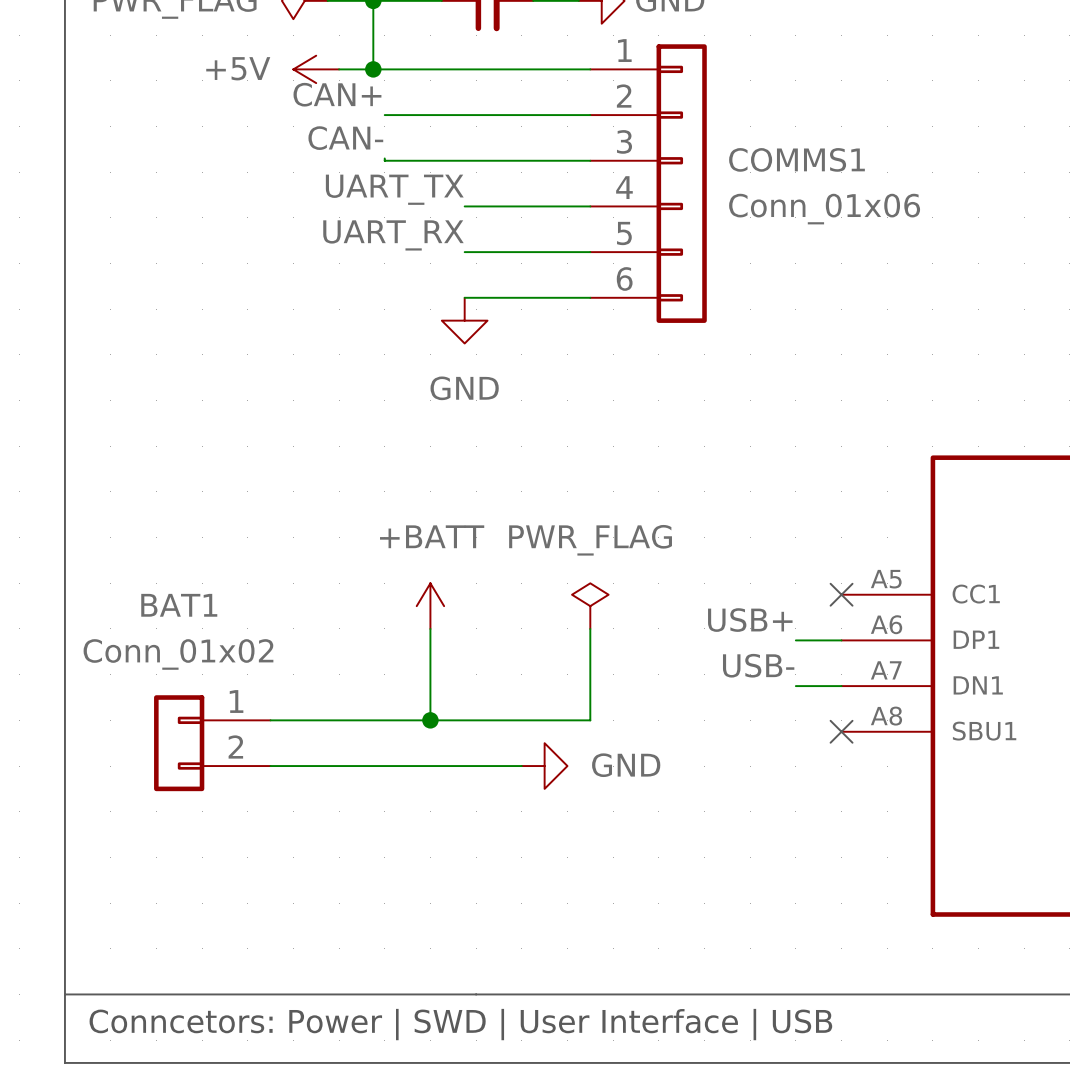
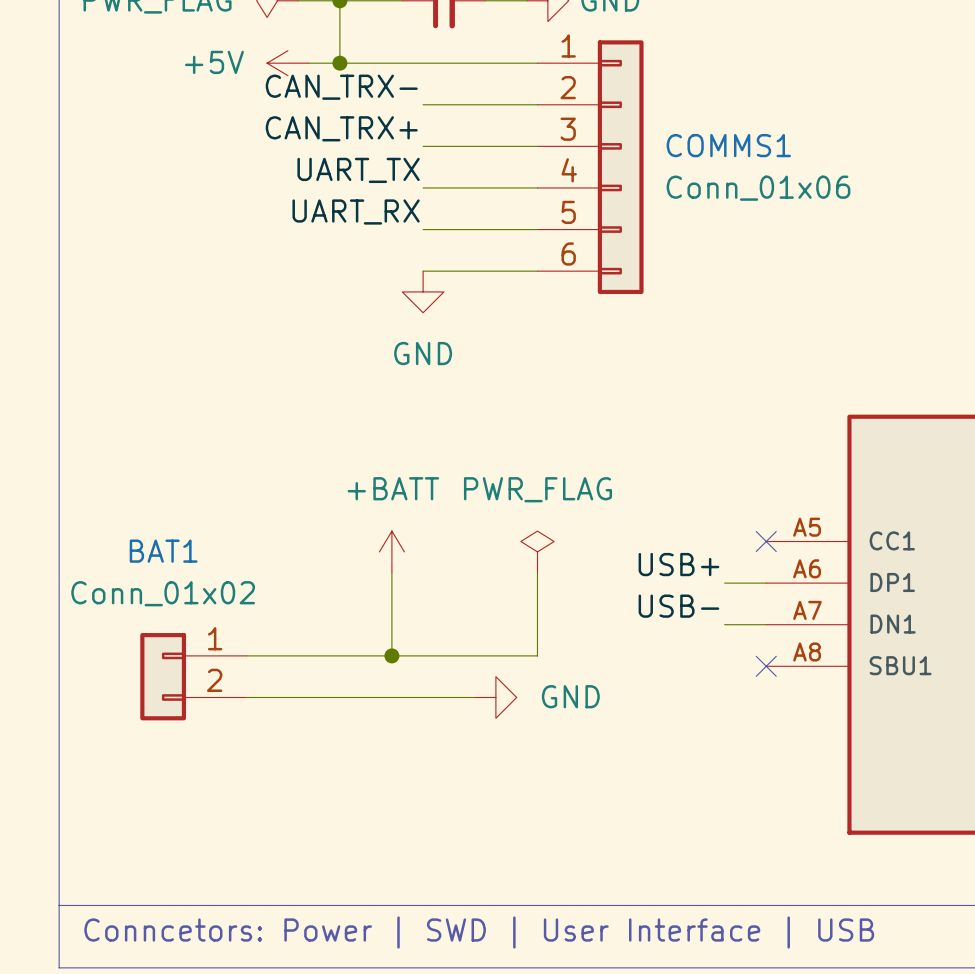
label: CAN+ (337, 94) -> CAN_TRX+ (341, 128)
wire: (384, 115) (464, 115) -> none
label: CAN- (345, 138) -> CAN_TRX- (341, 87)
wire: (384, 158) (384, 160) (464, 160) -> none

